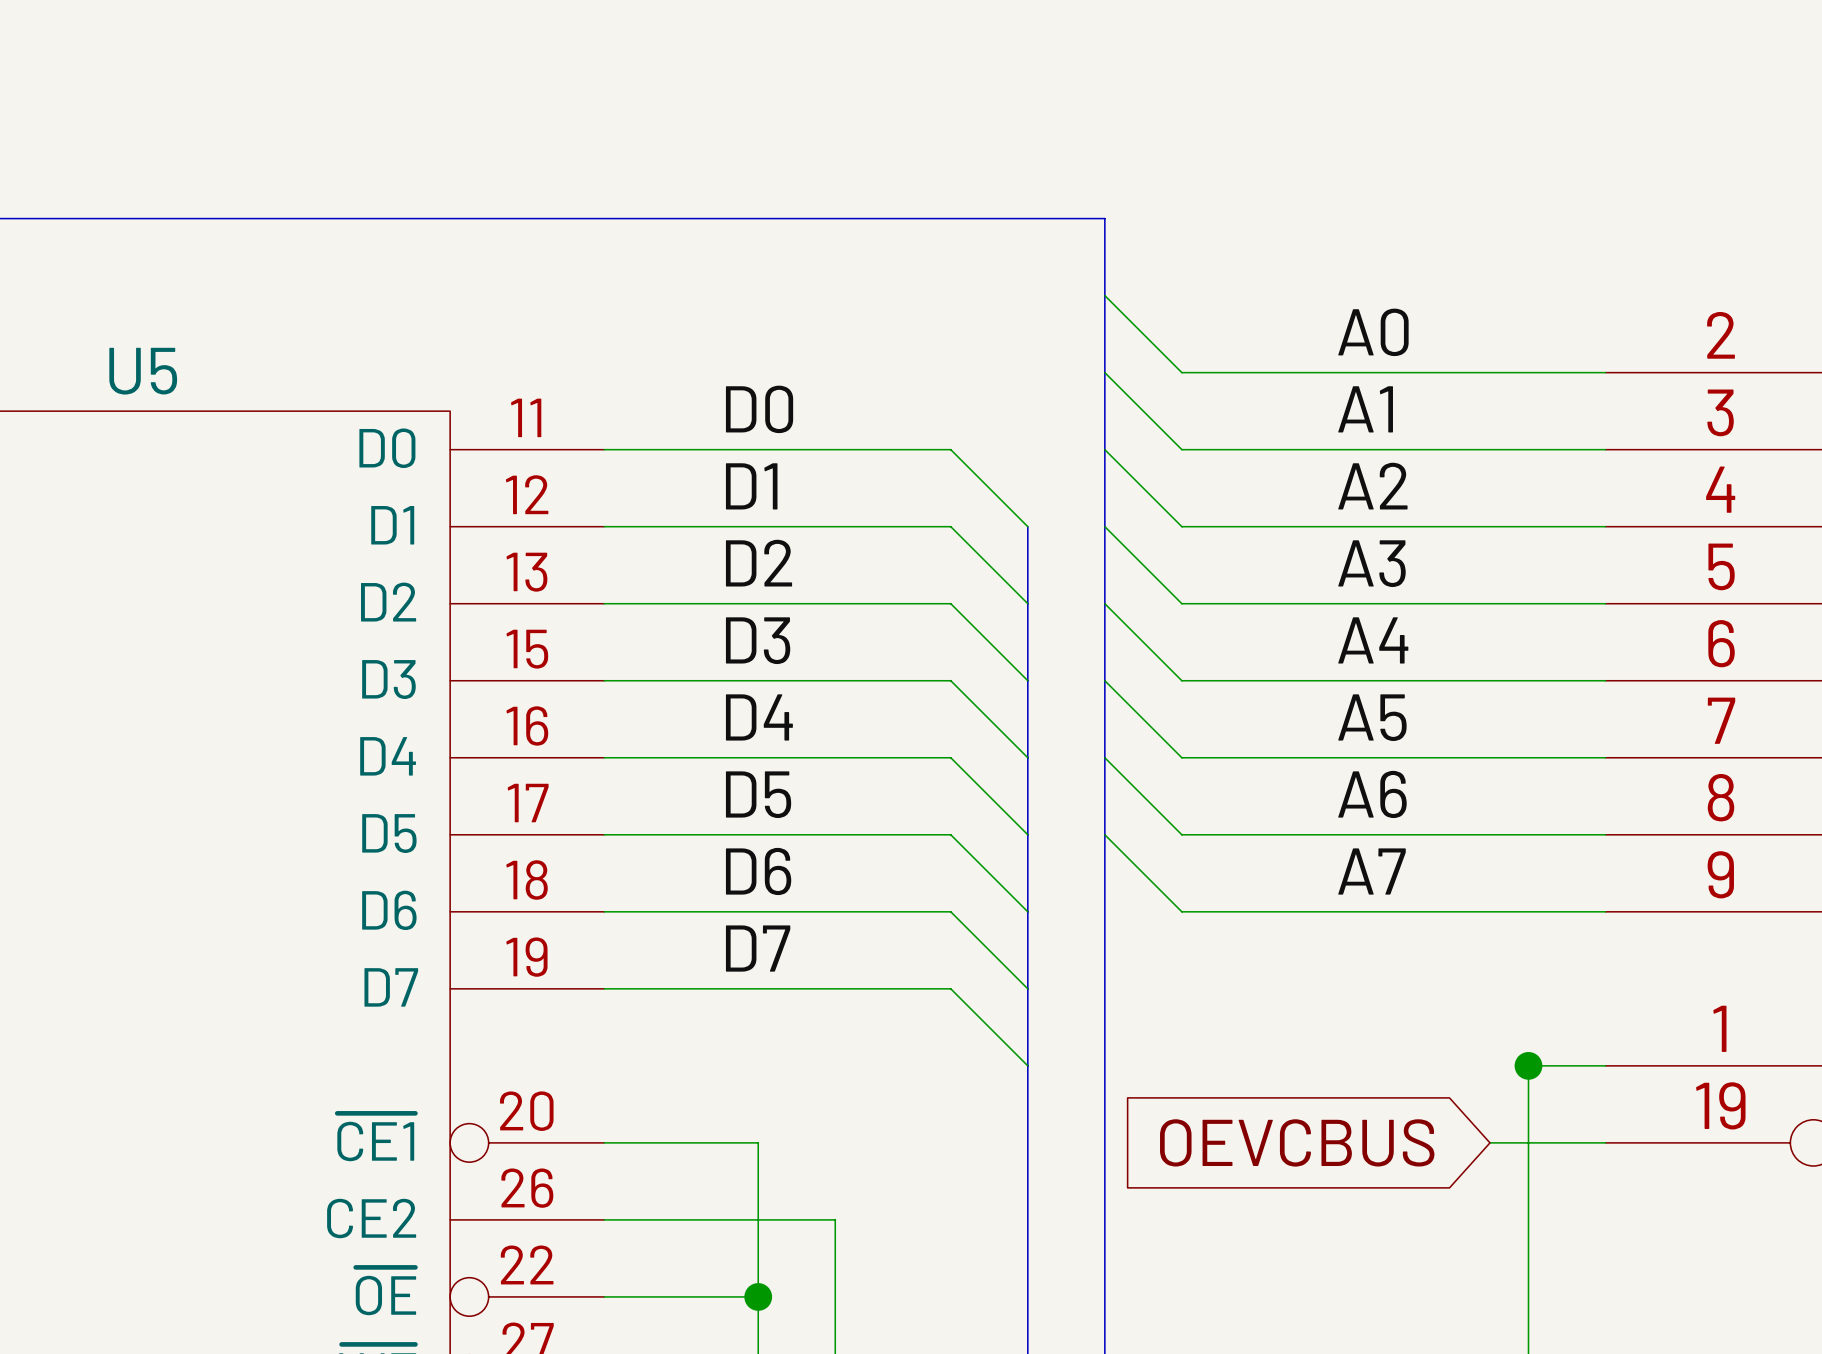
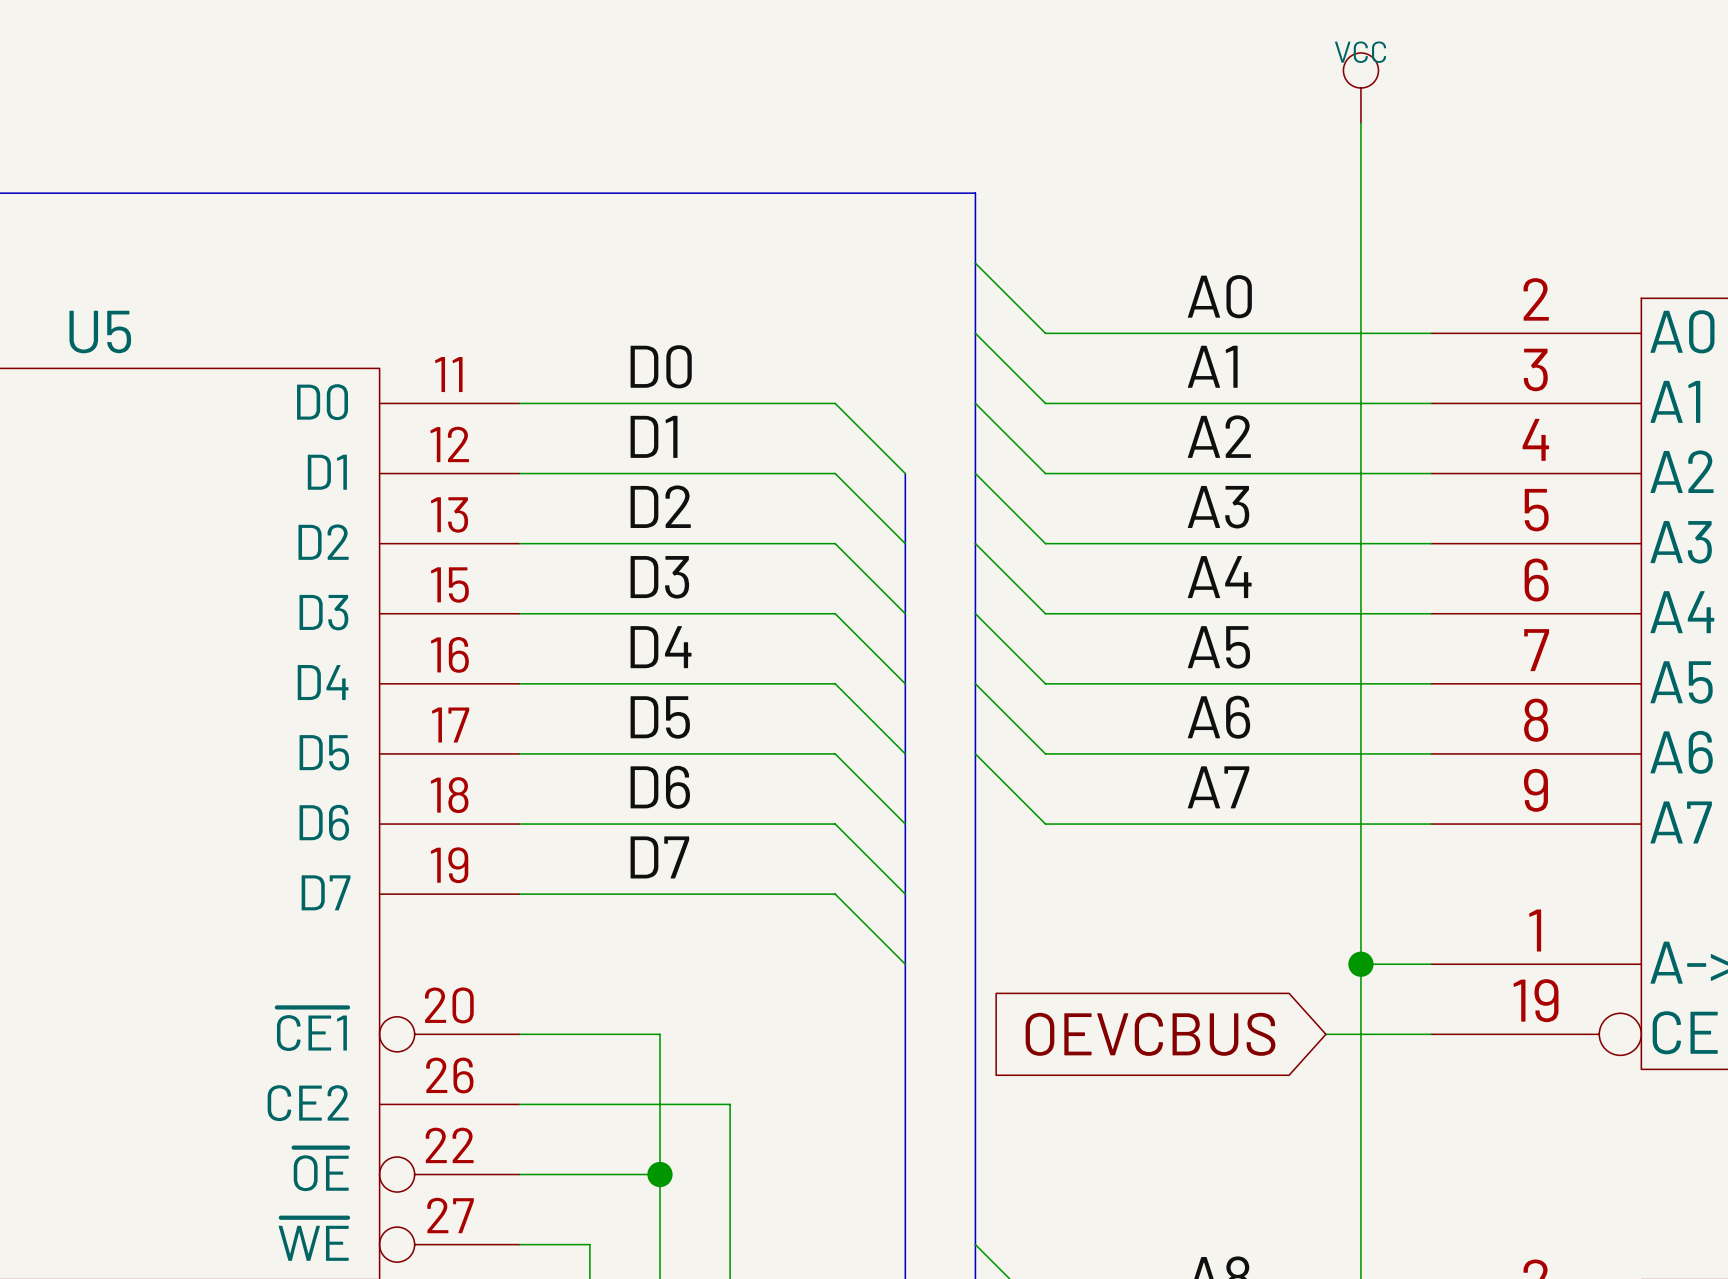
power symbol: none -> VCC (1360, 88)
wire: none -> (1360, 123) (1360, 964)

